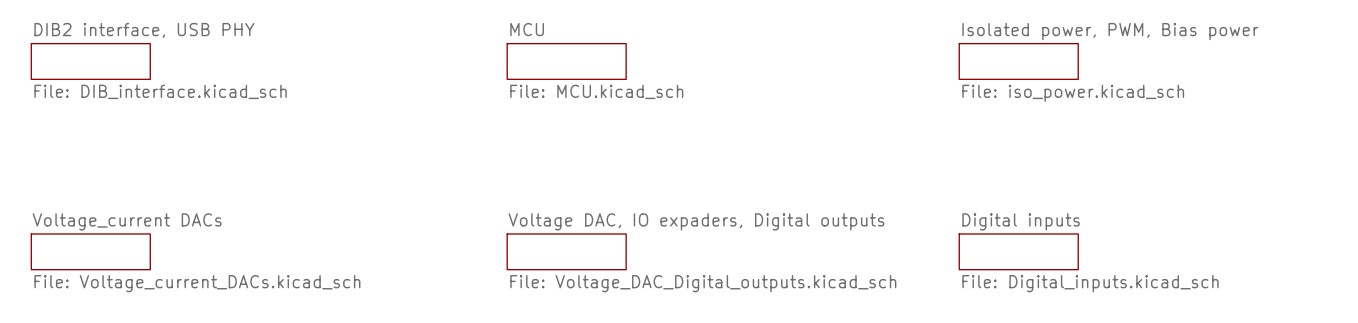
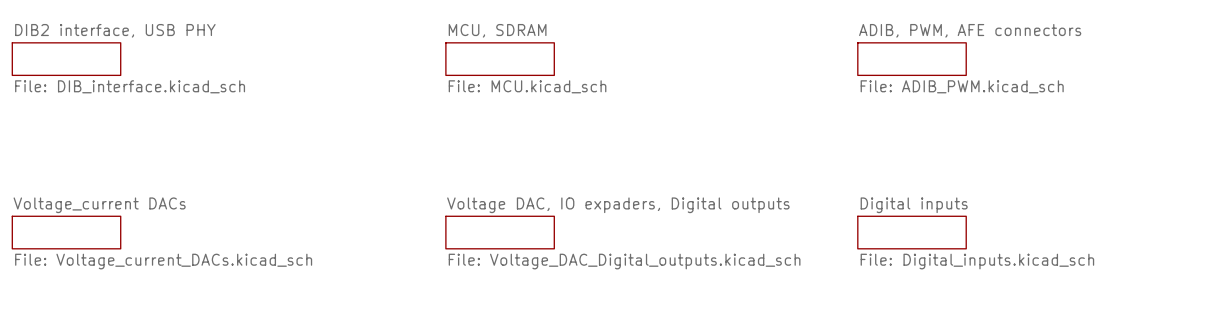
sheet MCU name: MCU (527, 29) -> MCU, SDRAM (497, 30)
sheet ADIB, PWM, AFE connectors name: Isolated power, PWM, Bias power (1110, 31) -> ADIB, PWM, AFE connectors (970, 30)
sheet ADIB, PWM, AFE connectors value: File: iso_power.kicad_sch (1073, 93) -> File: ADIB_PWM.kicad_sch (962, 86)

